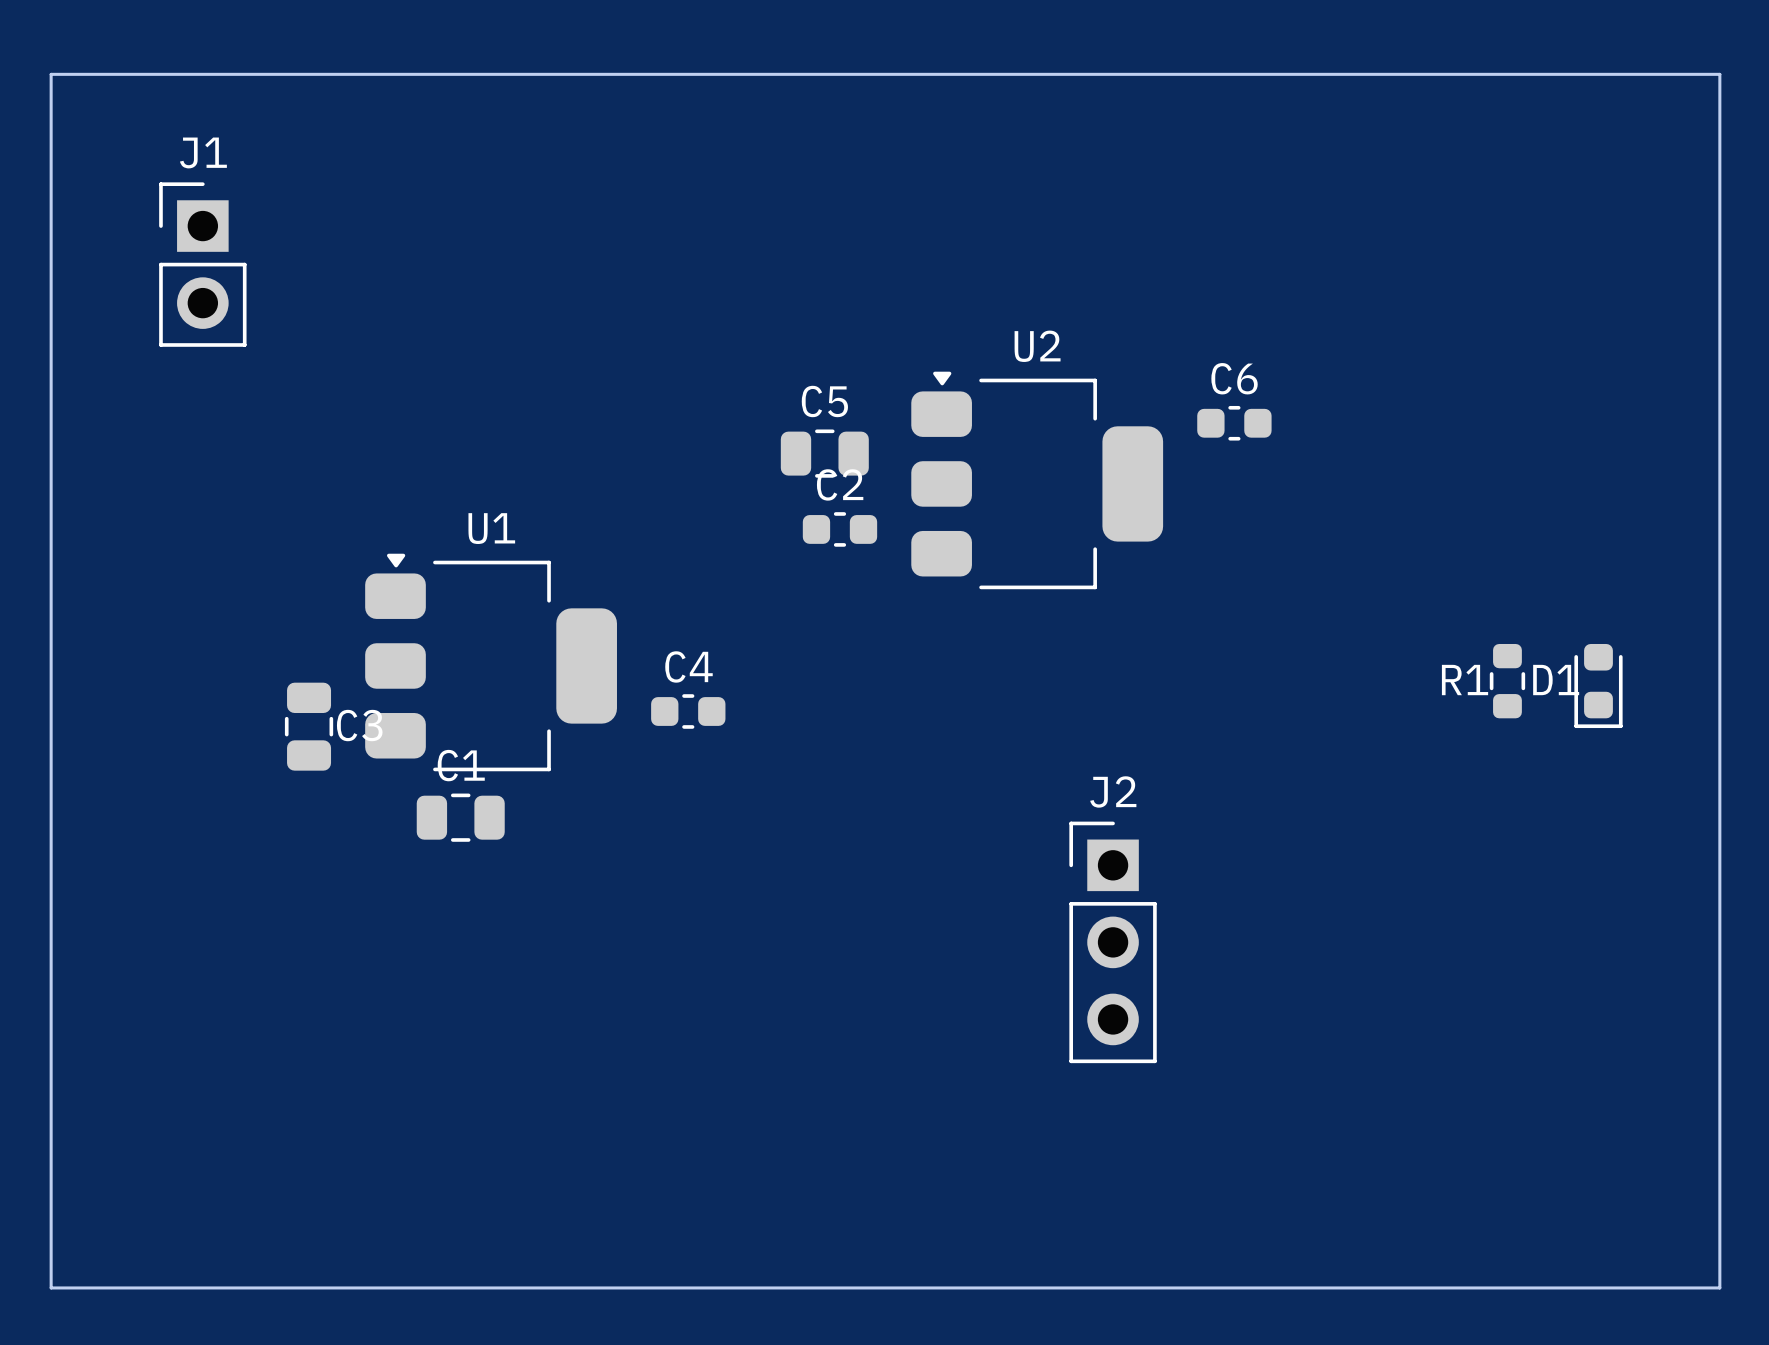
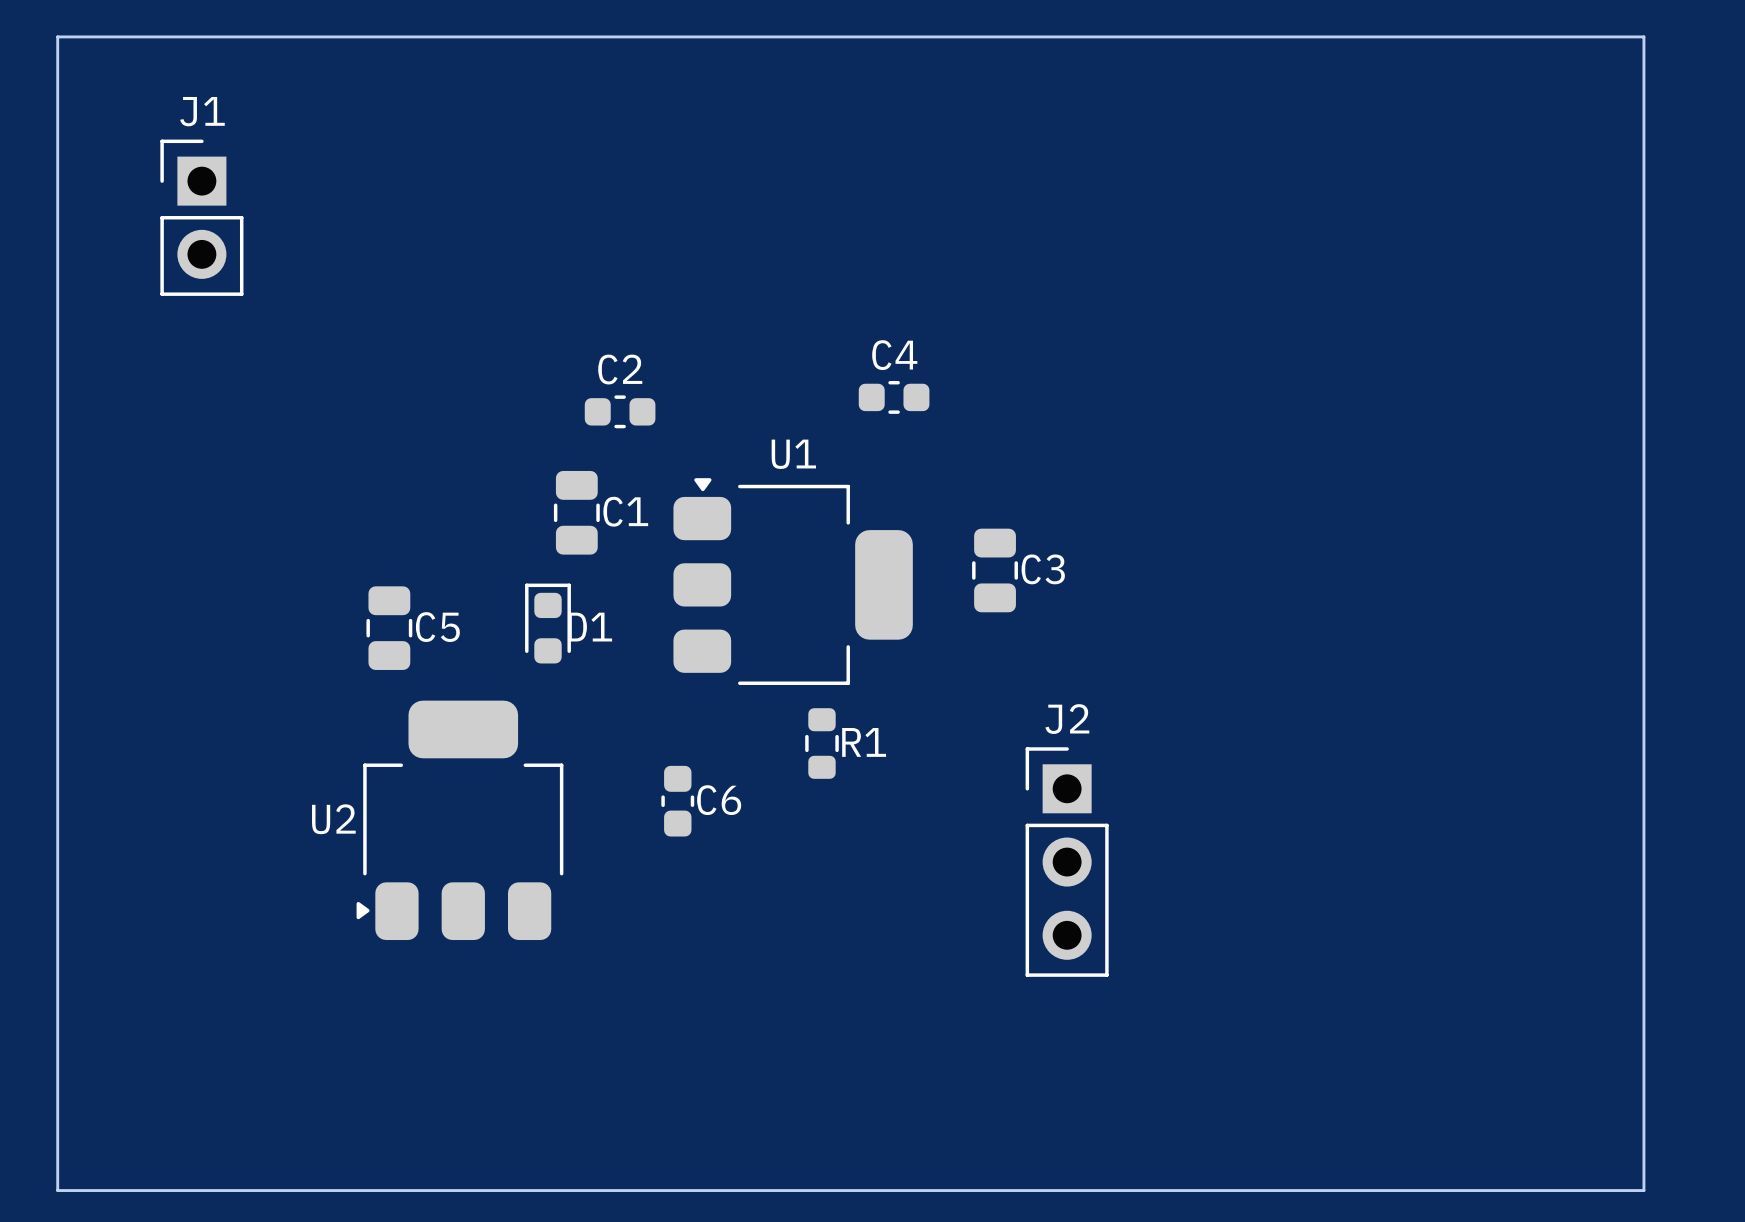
C6 rotation: 0° (1234, 423) -> 90° clockwise (677, 801)
C6 position: (1234, 423) -> (677, 801)
C5 rotation: 0° (824, 453) -> 90° clockwise (389, 628)
C5 position: (824, 453) -> (389, 628)
U2 rotation: 0° (1037, 480) -> 90° counterclockwise (459, 820)
U2 position: (1037, 480) -> (459, 820)
C2 position: (839, 529) -> (620, 411)
U1 position: (491, 662) -> (793, 581)
R1 name position: R1 (1465, 680) -> R1 (864, 742)
R1 position: (1507, 681) -> (821, 743)
D1 rotation: 0° (1598, 686) -> 180° (548, 623)
D1 position: (1598, 686) -> (548, 623)
C4 position: (688, 711) -> (894, 397)
C3 position: (309, 726) -> (995, 570)
C1 rotation: 0° (460, 817) -> 90° clockwise (576, 512)
C1 position: (460, 817) -> (576, 512)

